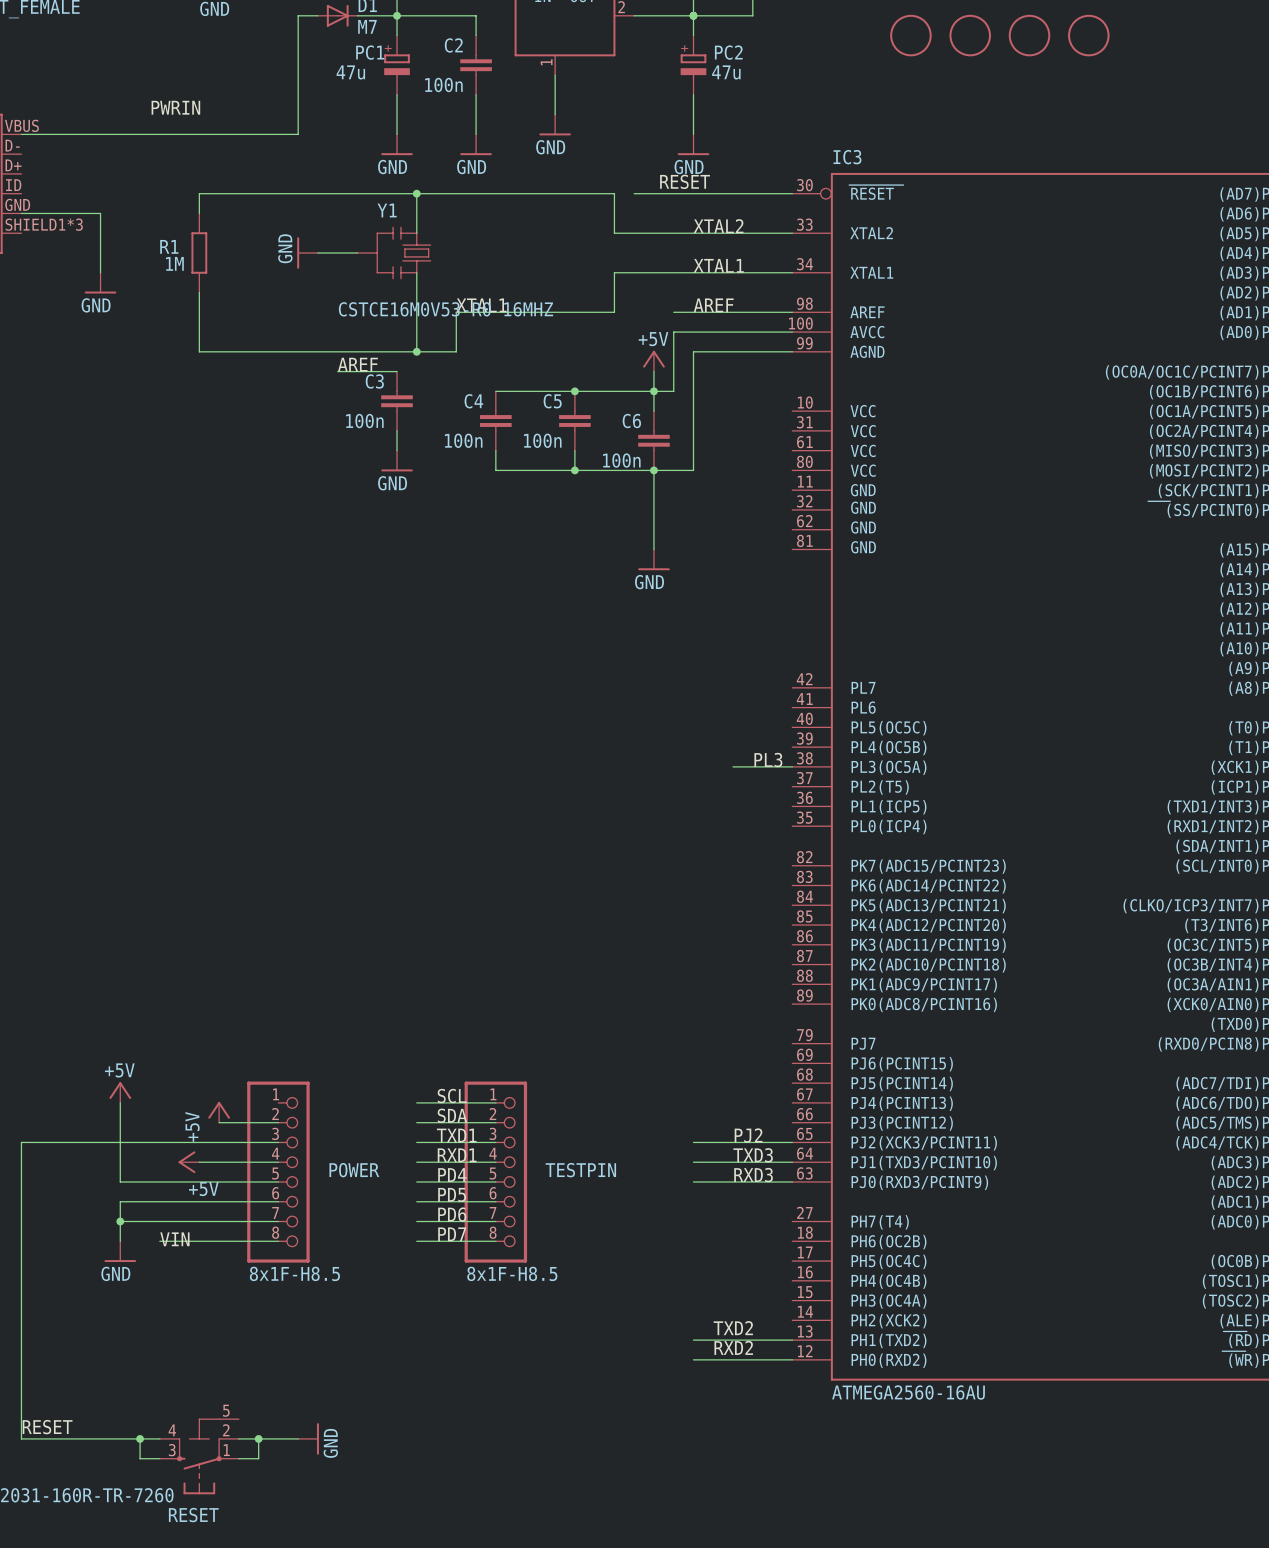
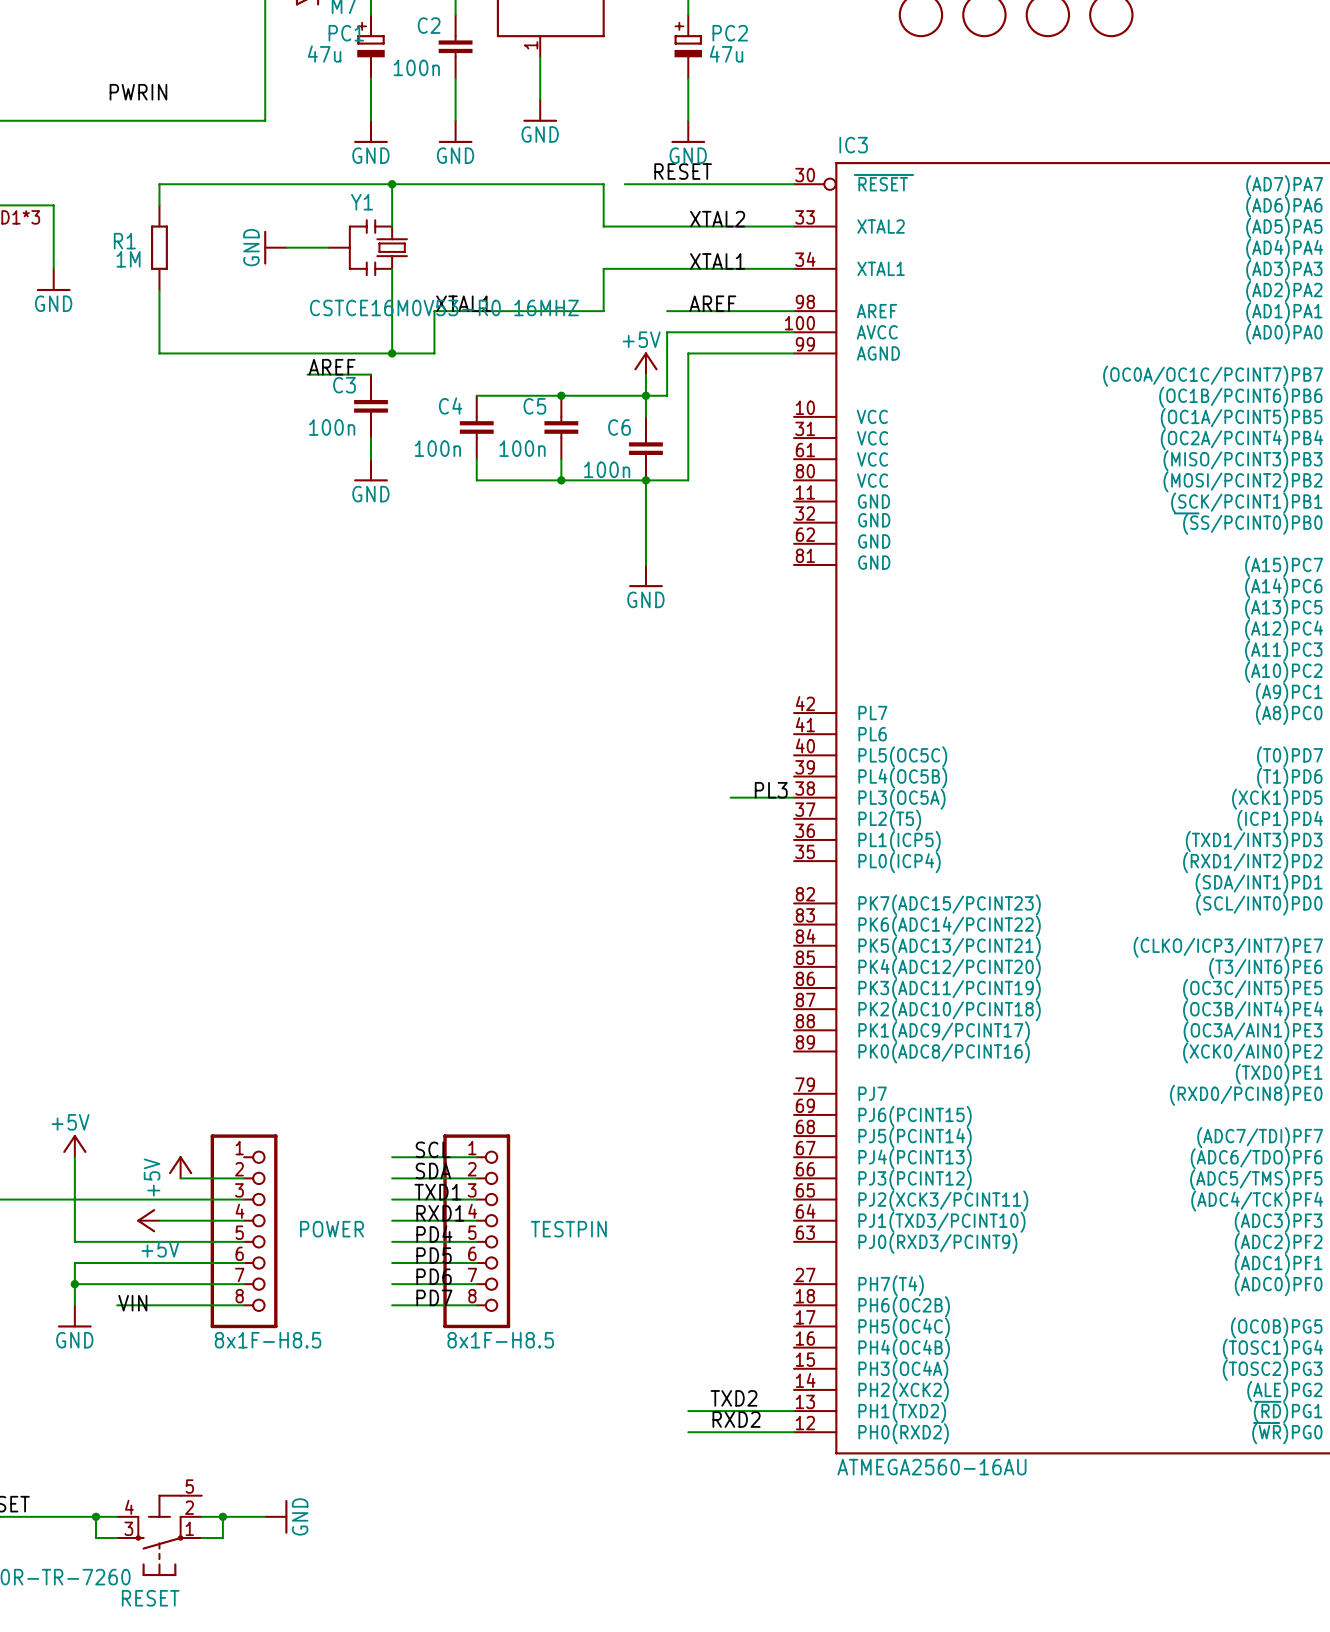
label: PJ2 (748, 1135) -> none
wire: (693, 1142) (792, 1142) -> none
label: TXD3 (753, 1155) -> none
wire: (693, 1162) (792, 1162) -> none
label: RXD3 (753, 1175) -> none
wire: (693, 1181) (792, 1181) -> none

